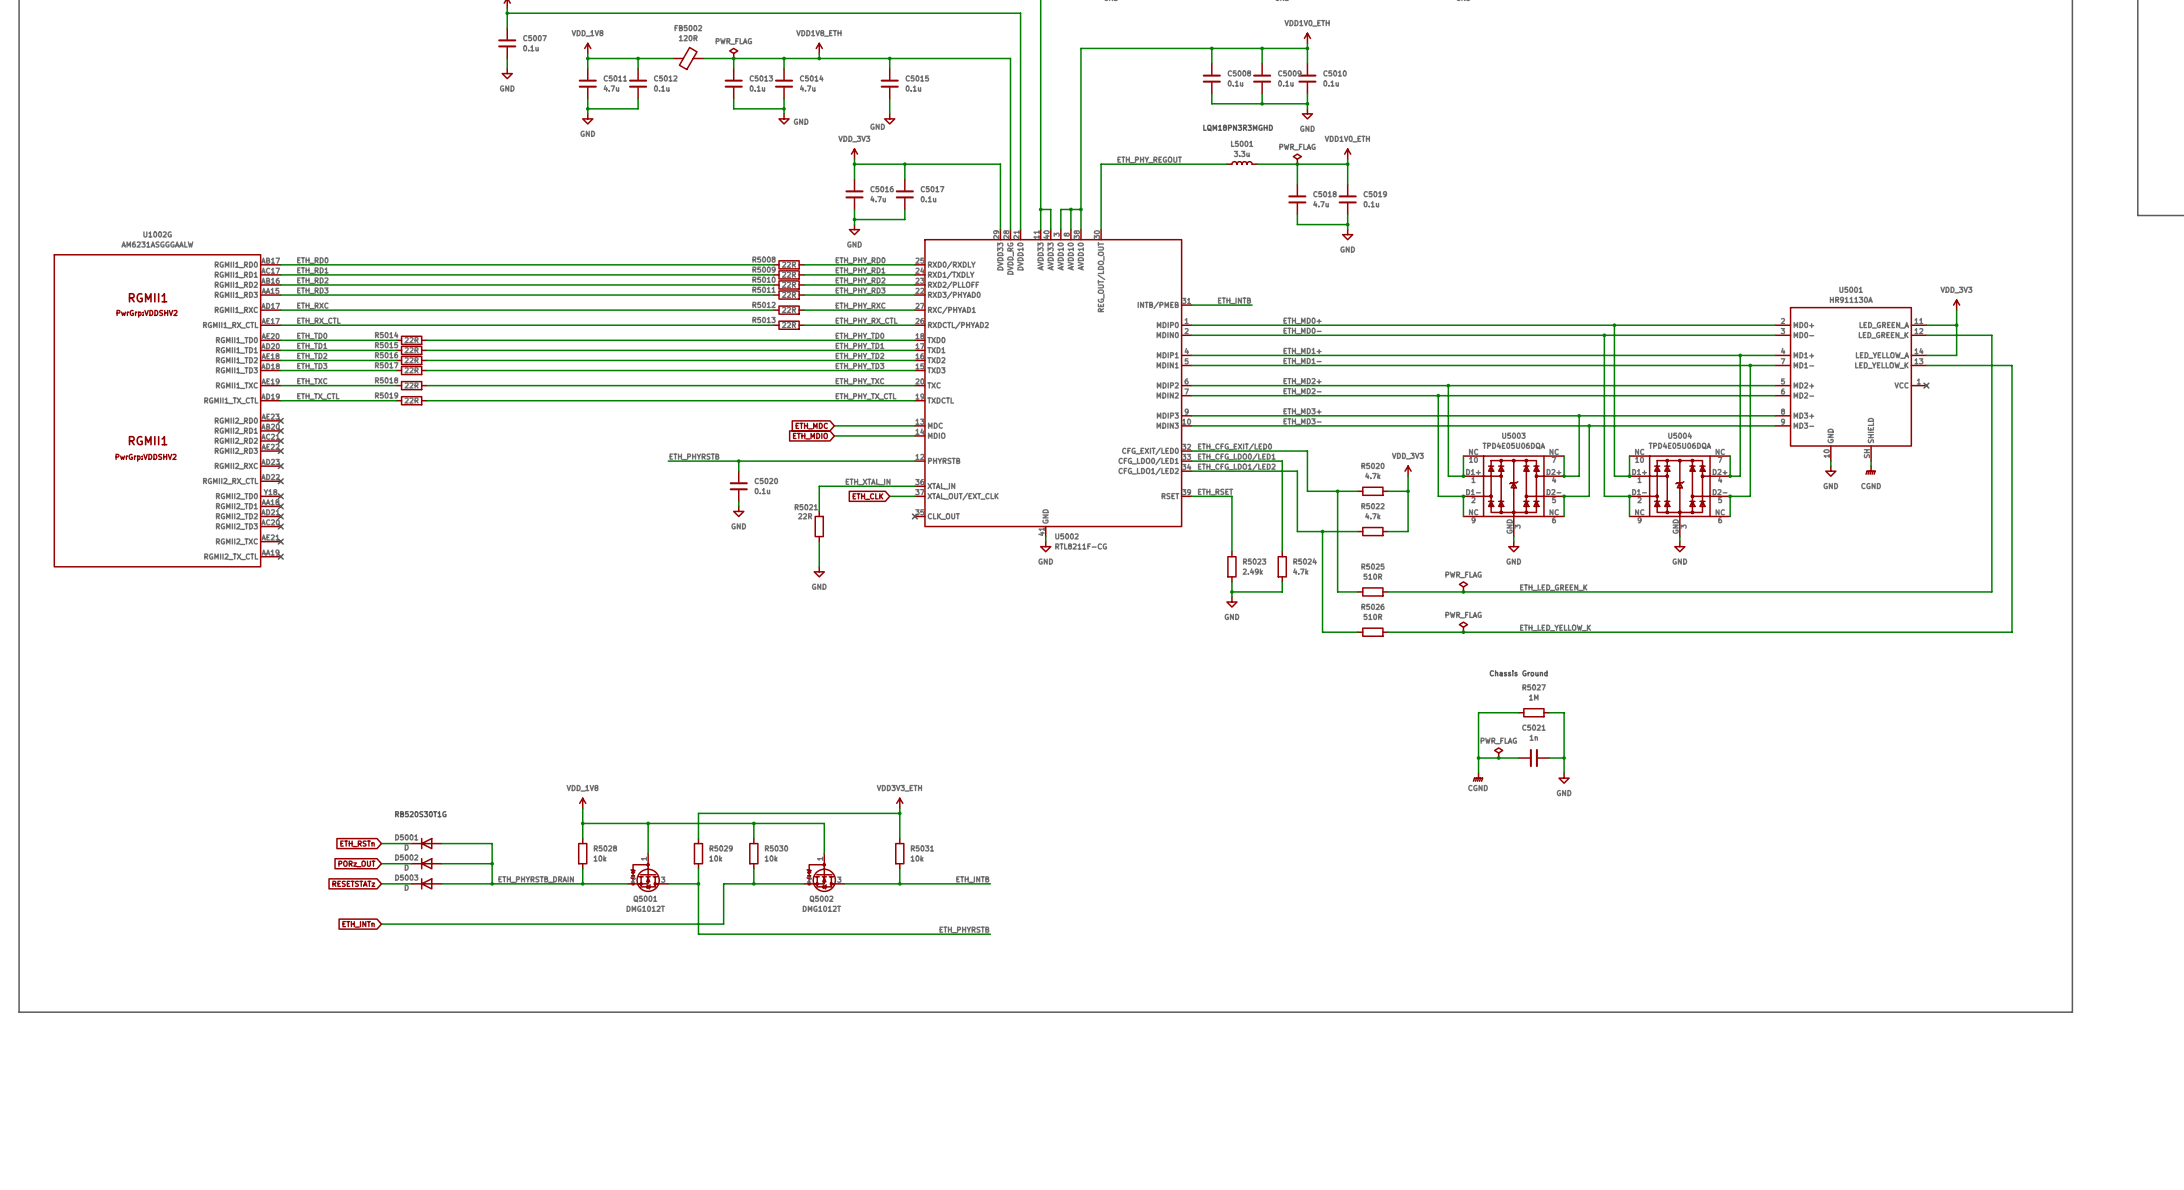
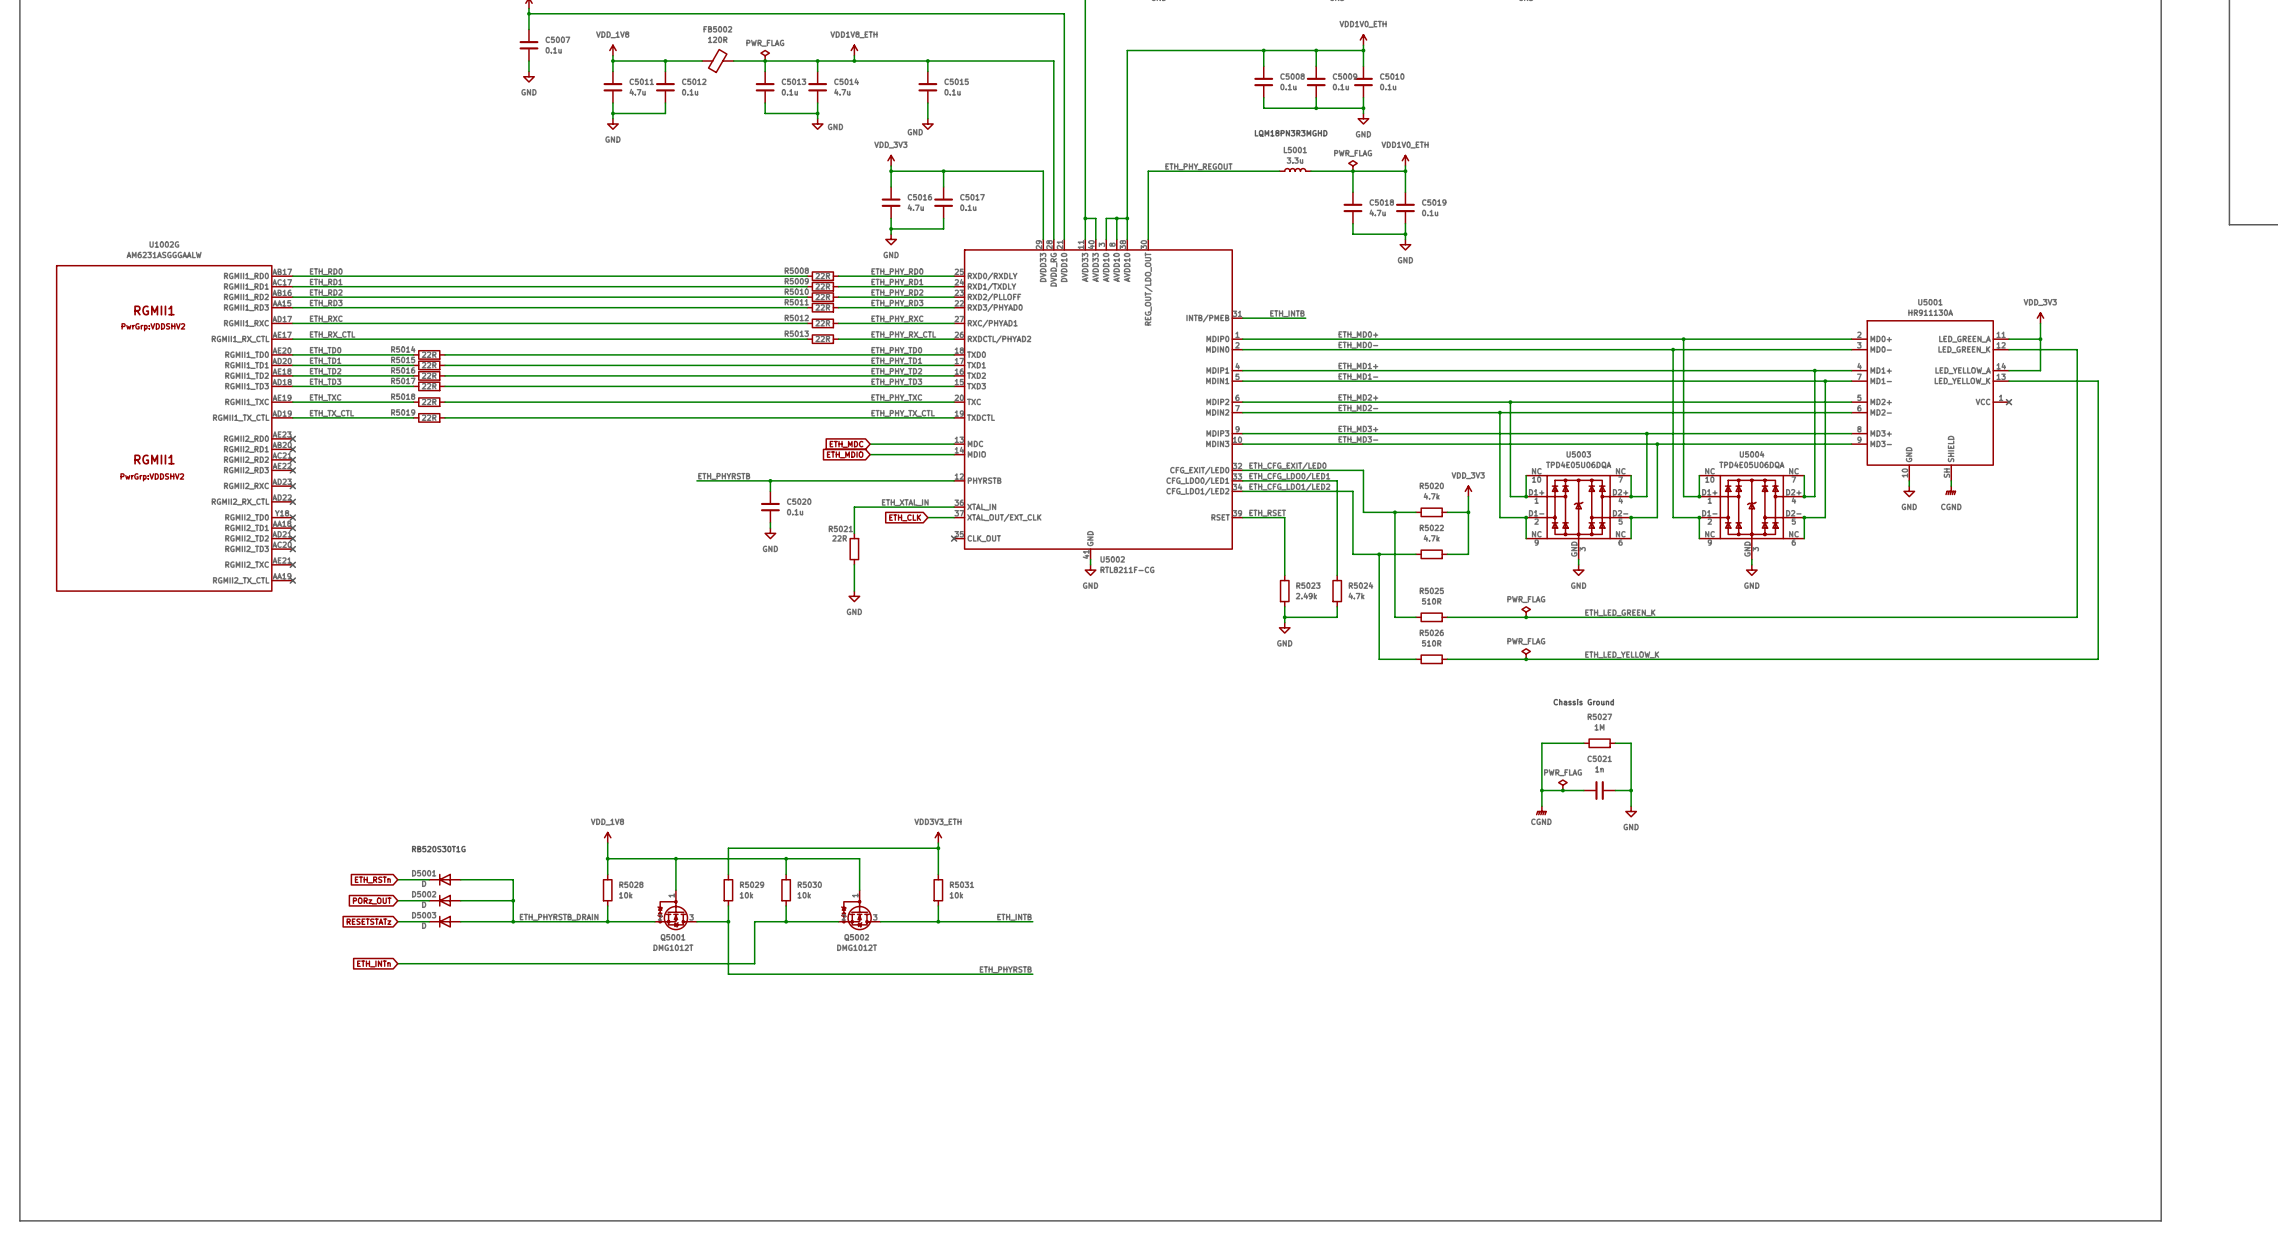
line: (19, 1012) (2072, 1012) -> (19, 1055) (19, 1220) (2161, 1220) (2161, 1055)

